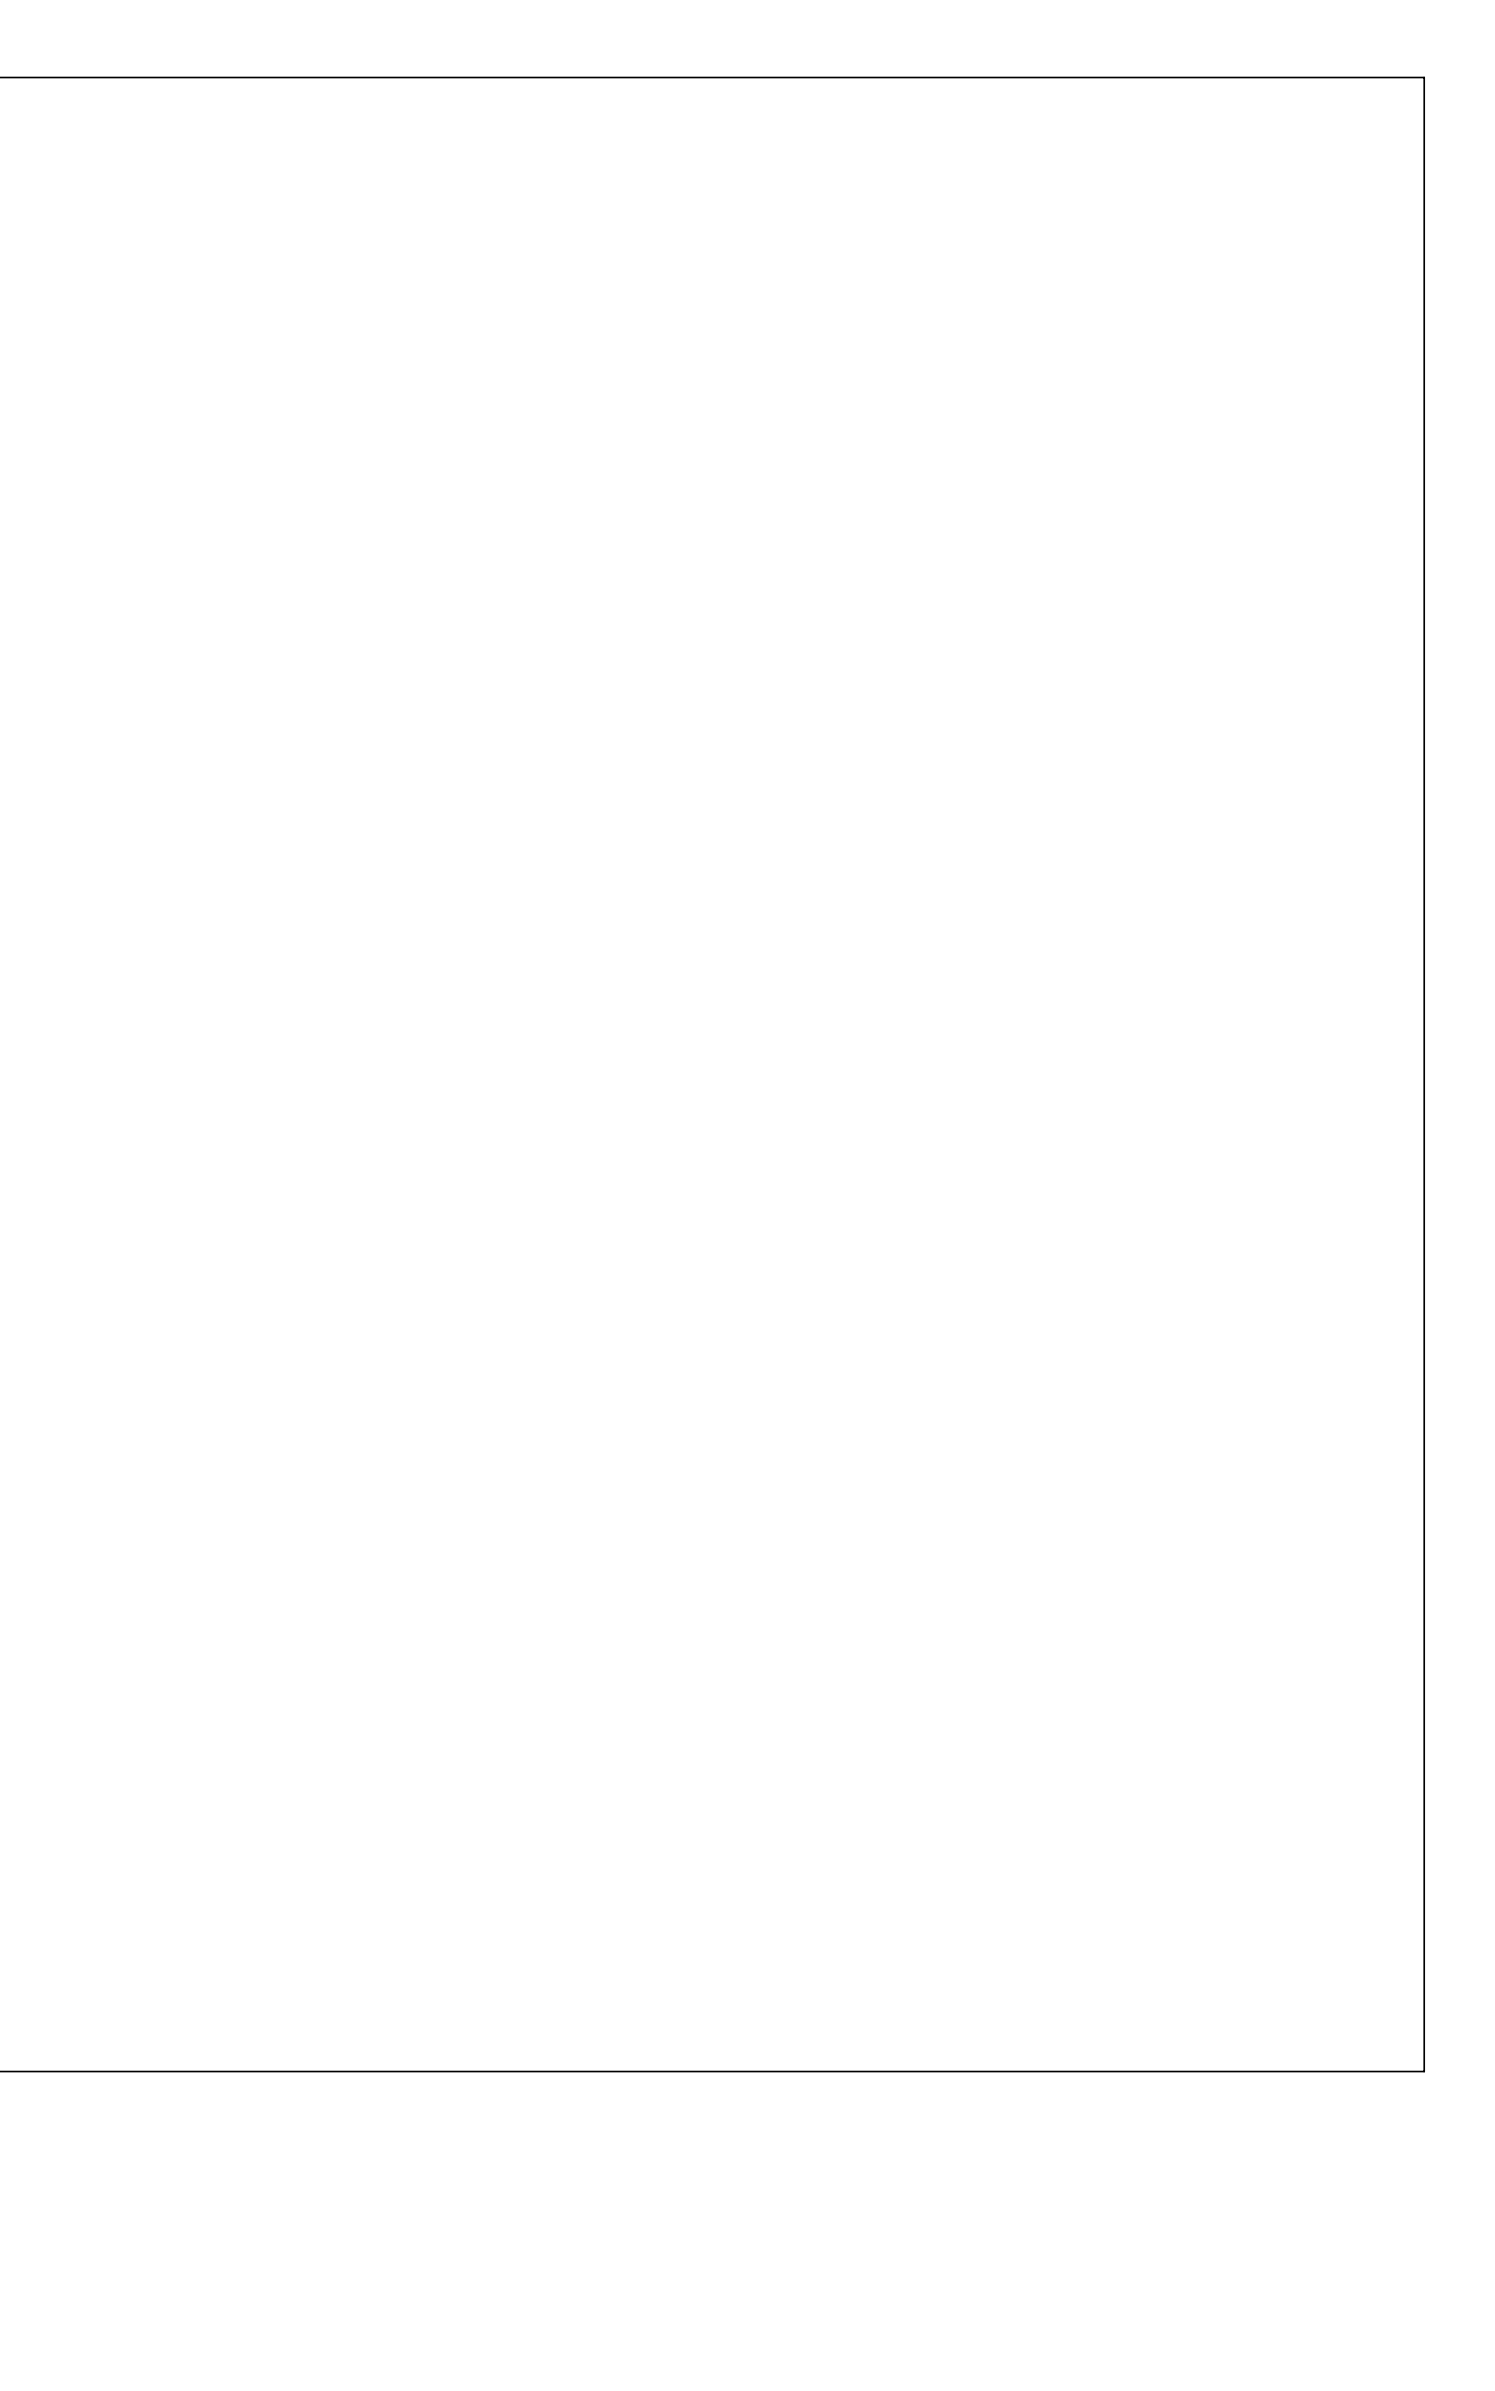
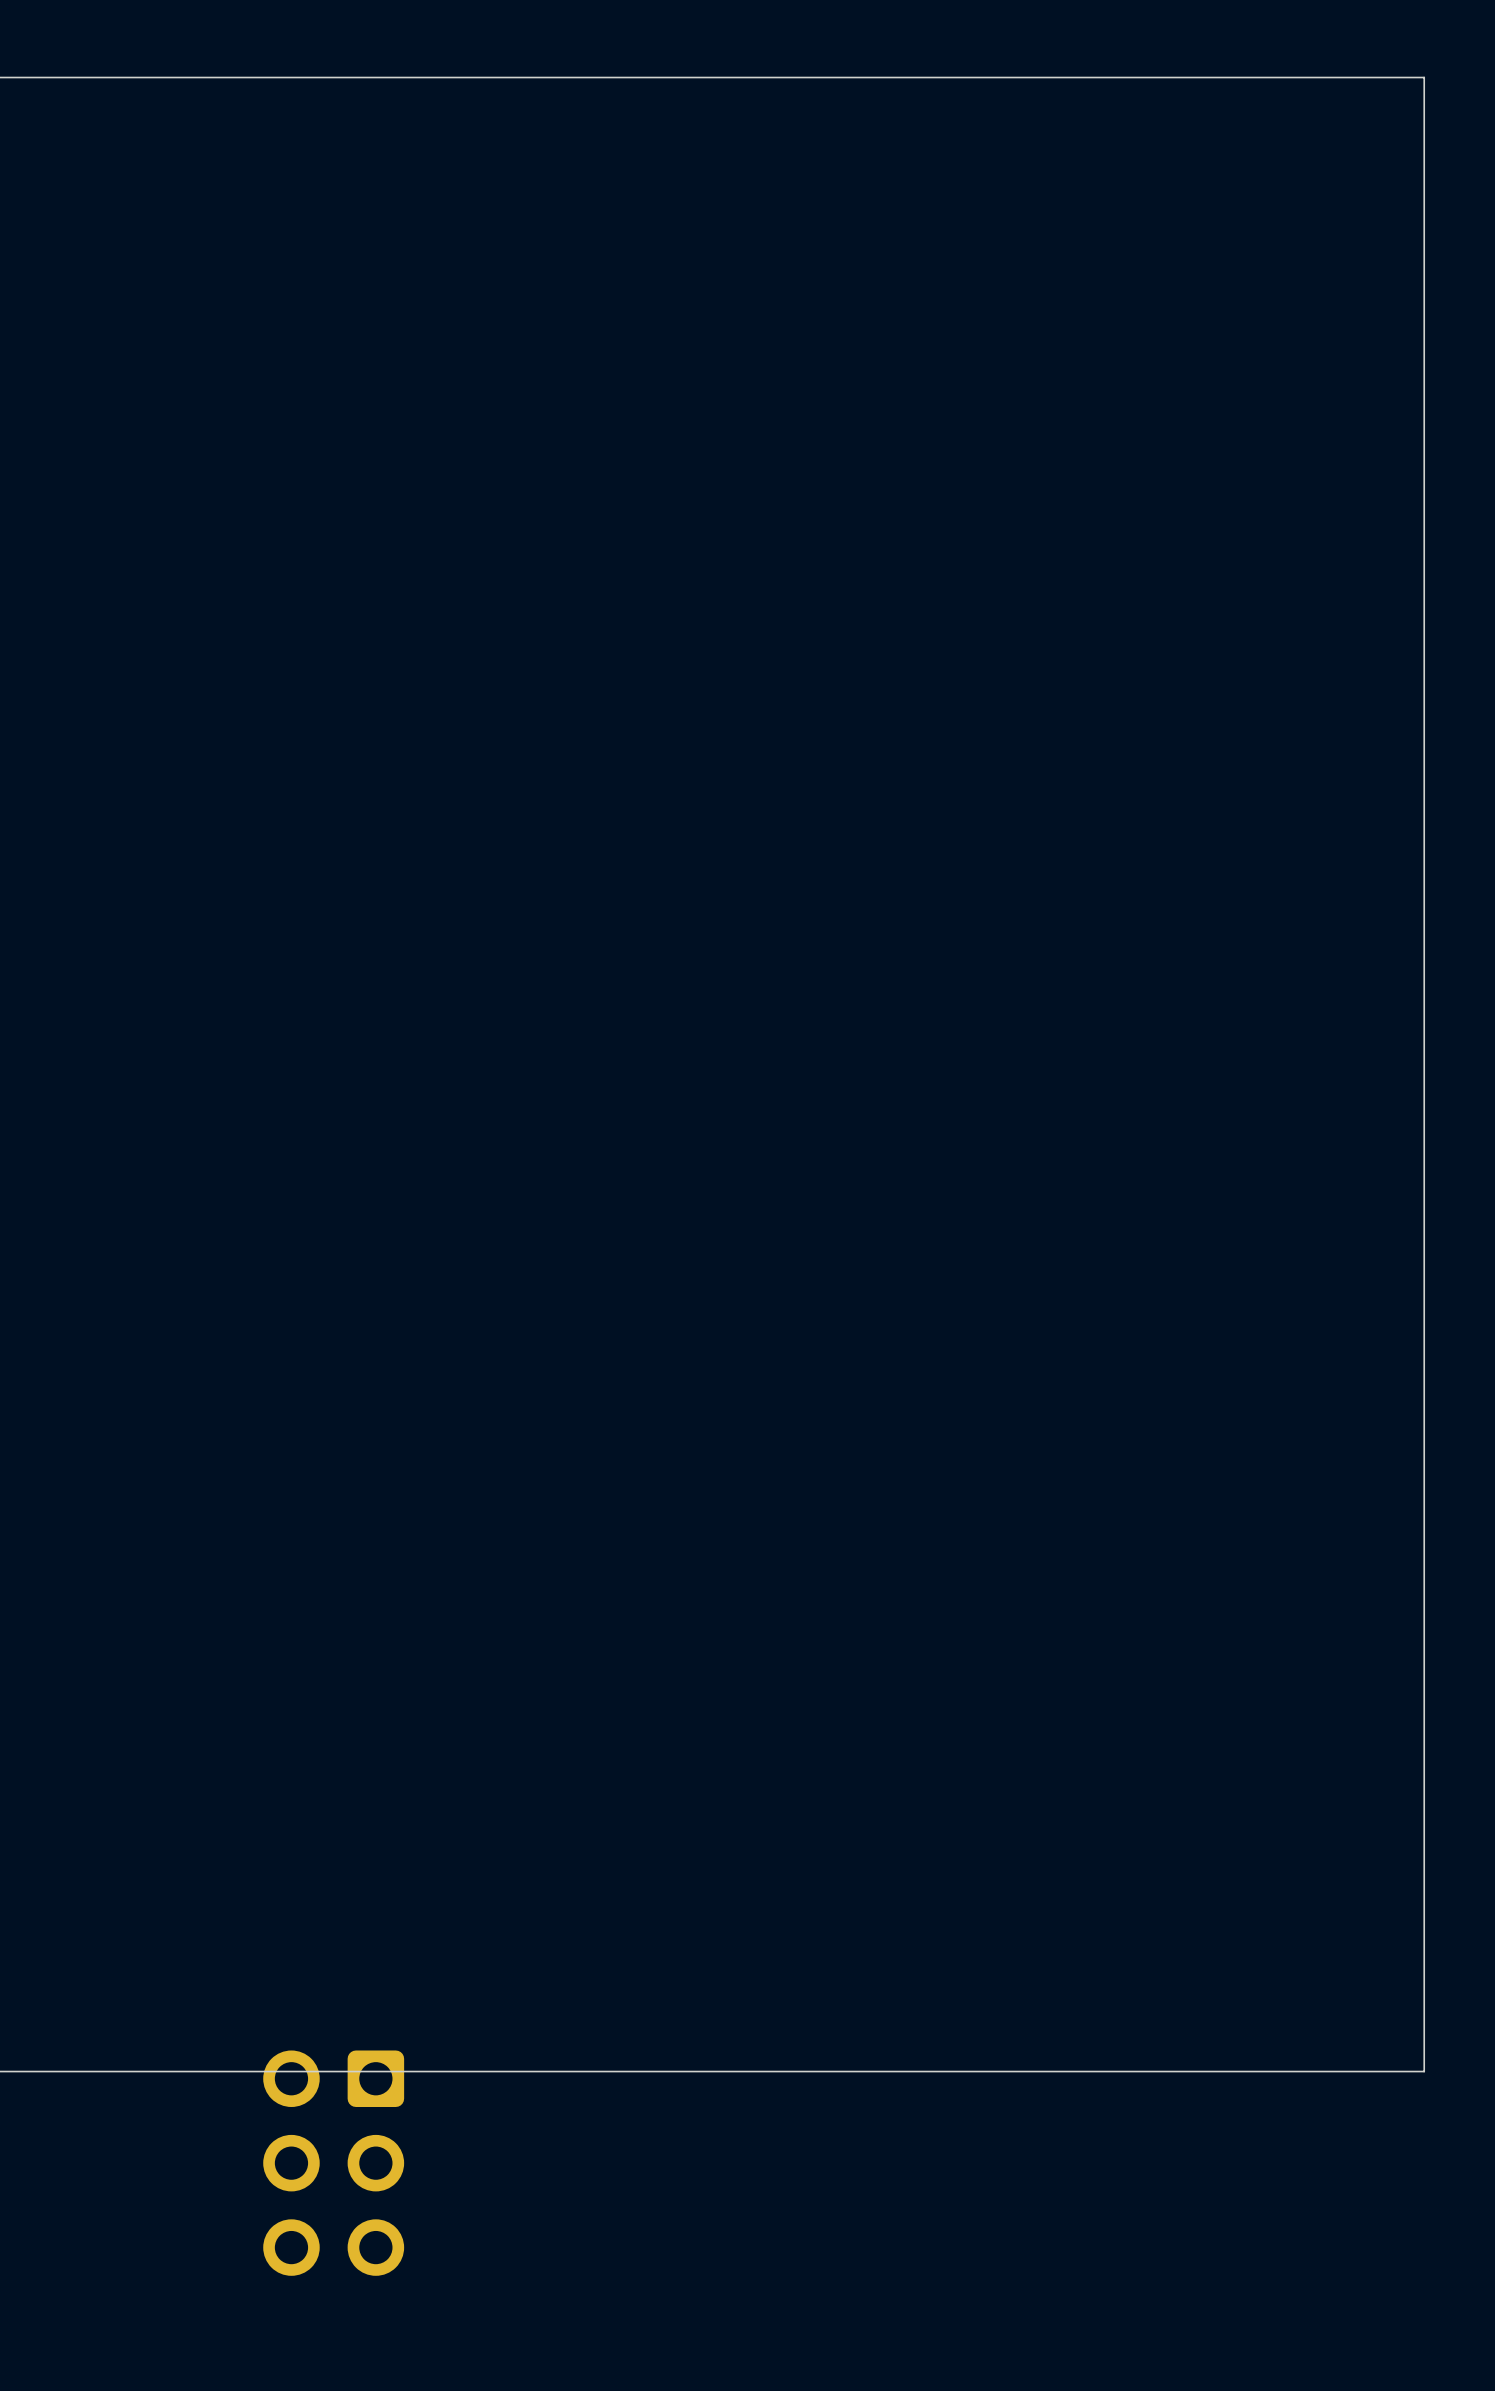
part: none -> (333, 2163)

